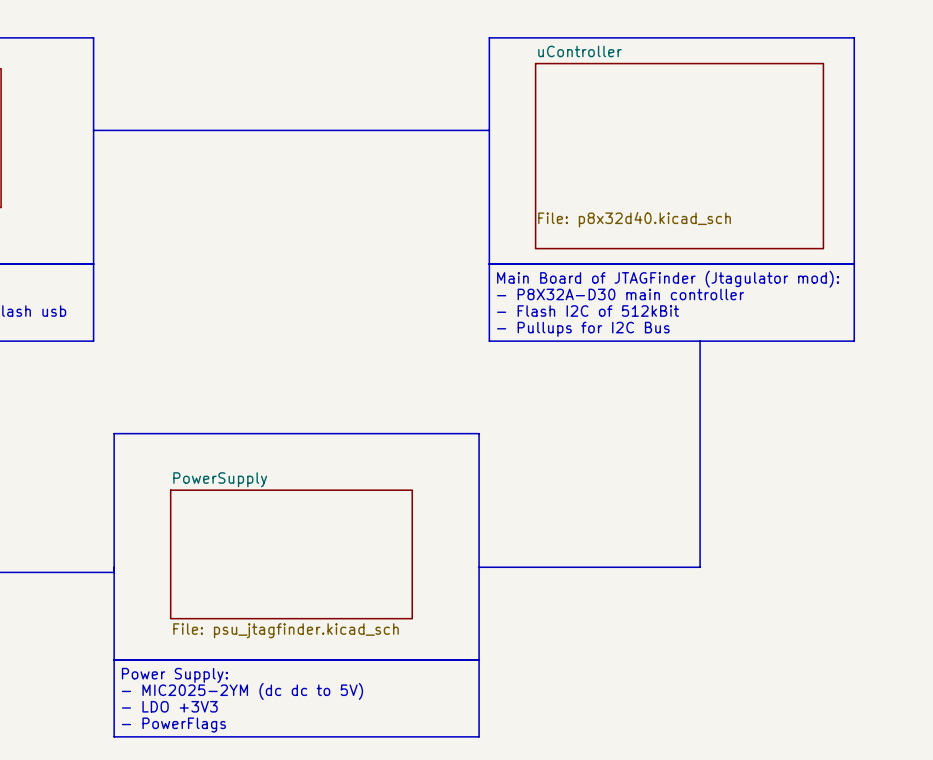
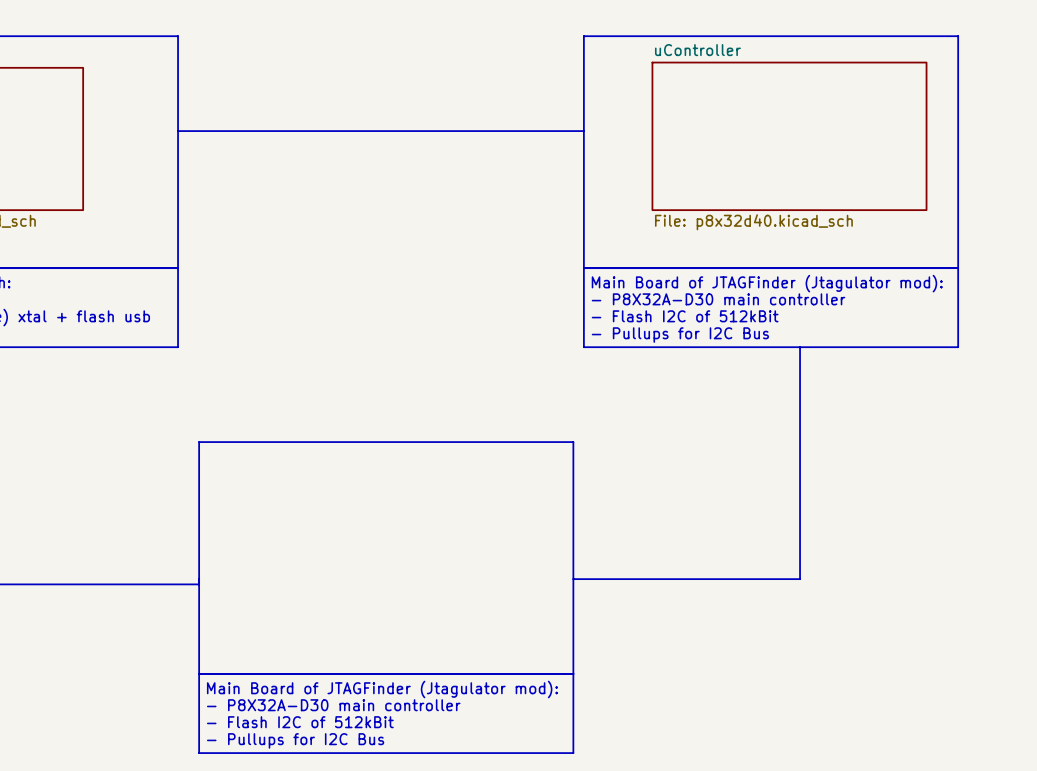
sheet uController: none -> File: p8x32d40.kicad_sch (789, 136)
sheet uController: File: p8x32d40.kicad_sch (679, 156) -> none
sheet PowerSupply: File: psu_jtagfinder.kicad_sch (291, 554) -> none
text: Power Supply: (174, 675) -> Main Board of JTAGFinder (Jtagulator mod): (382, 689)
text: - MIC2025-2YM (dc dc to 5V) (242, 691) -> - P8X32A-D30 main controller (333, 705)
text: - LDO +3V3 (169, 706) -> - Flash I2C of 512kBit (300, 722)
text: - PowerFlags (173, 725) -> - Pullups for I2C Bus (295, 740)

